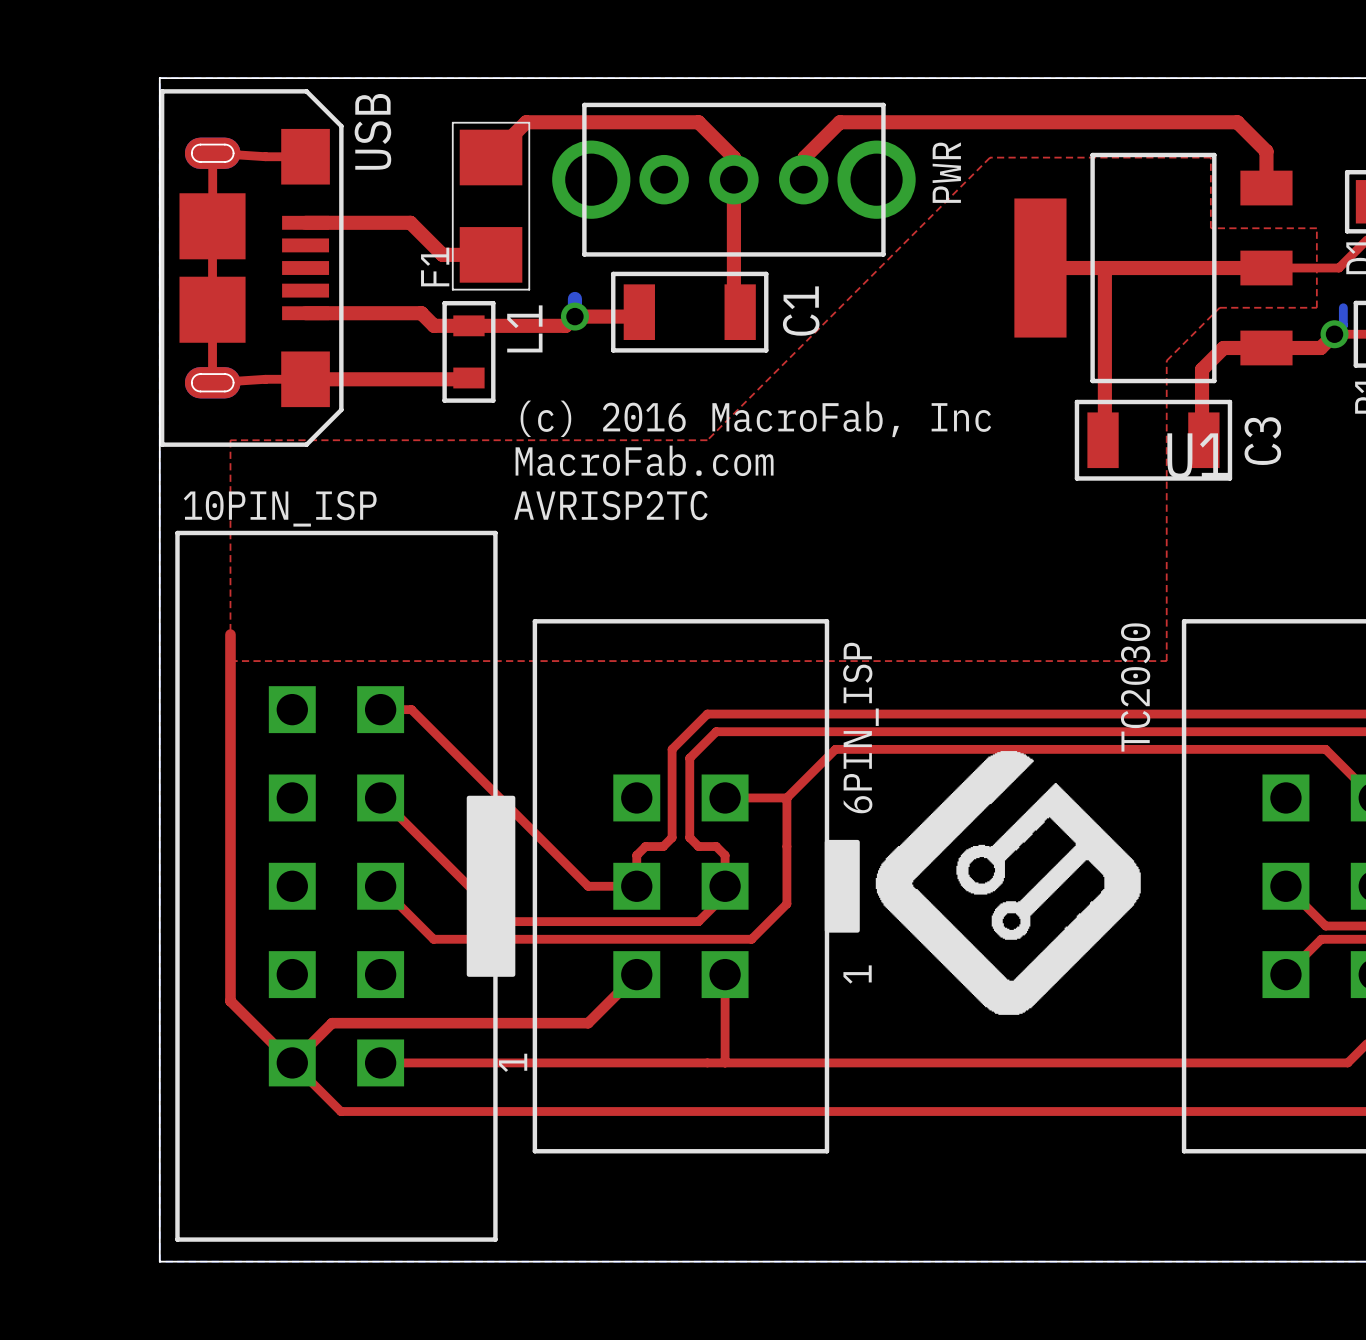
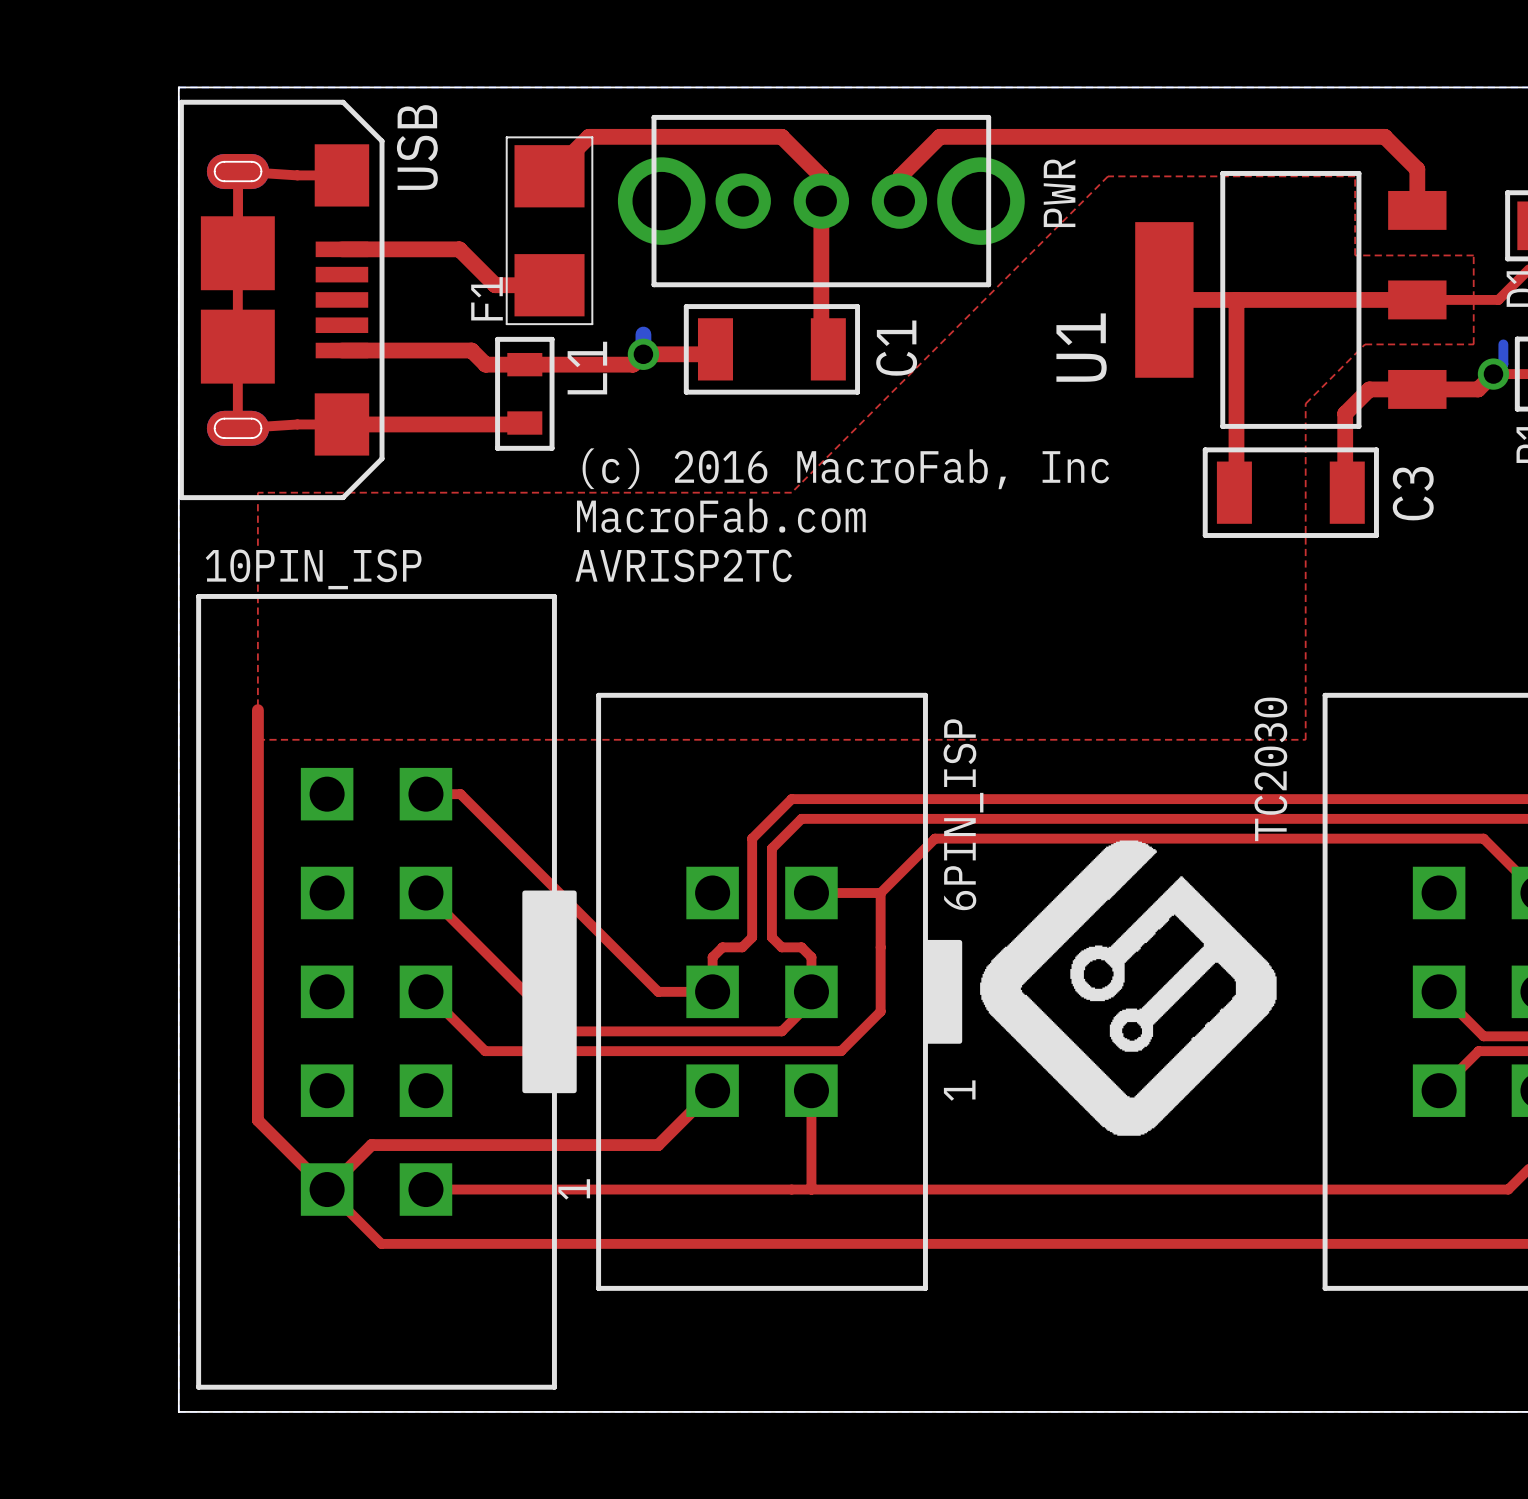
U1 name rotation: 0° (1197, 455) -> 90° counterclockwise (1081, 347)
U1 name position: U1 (1197, 455) -> U1 (1081, 347)

